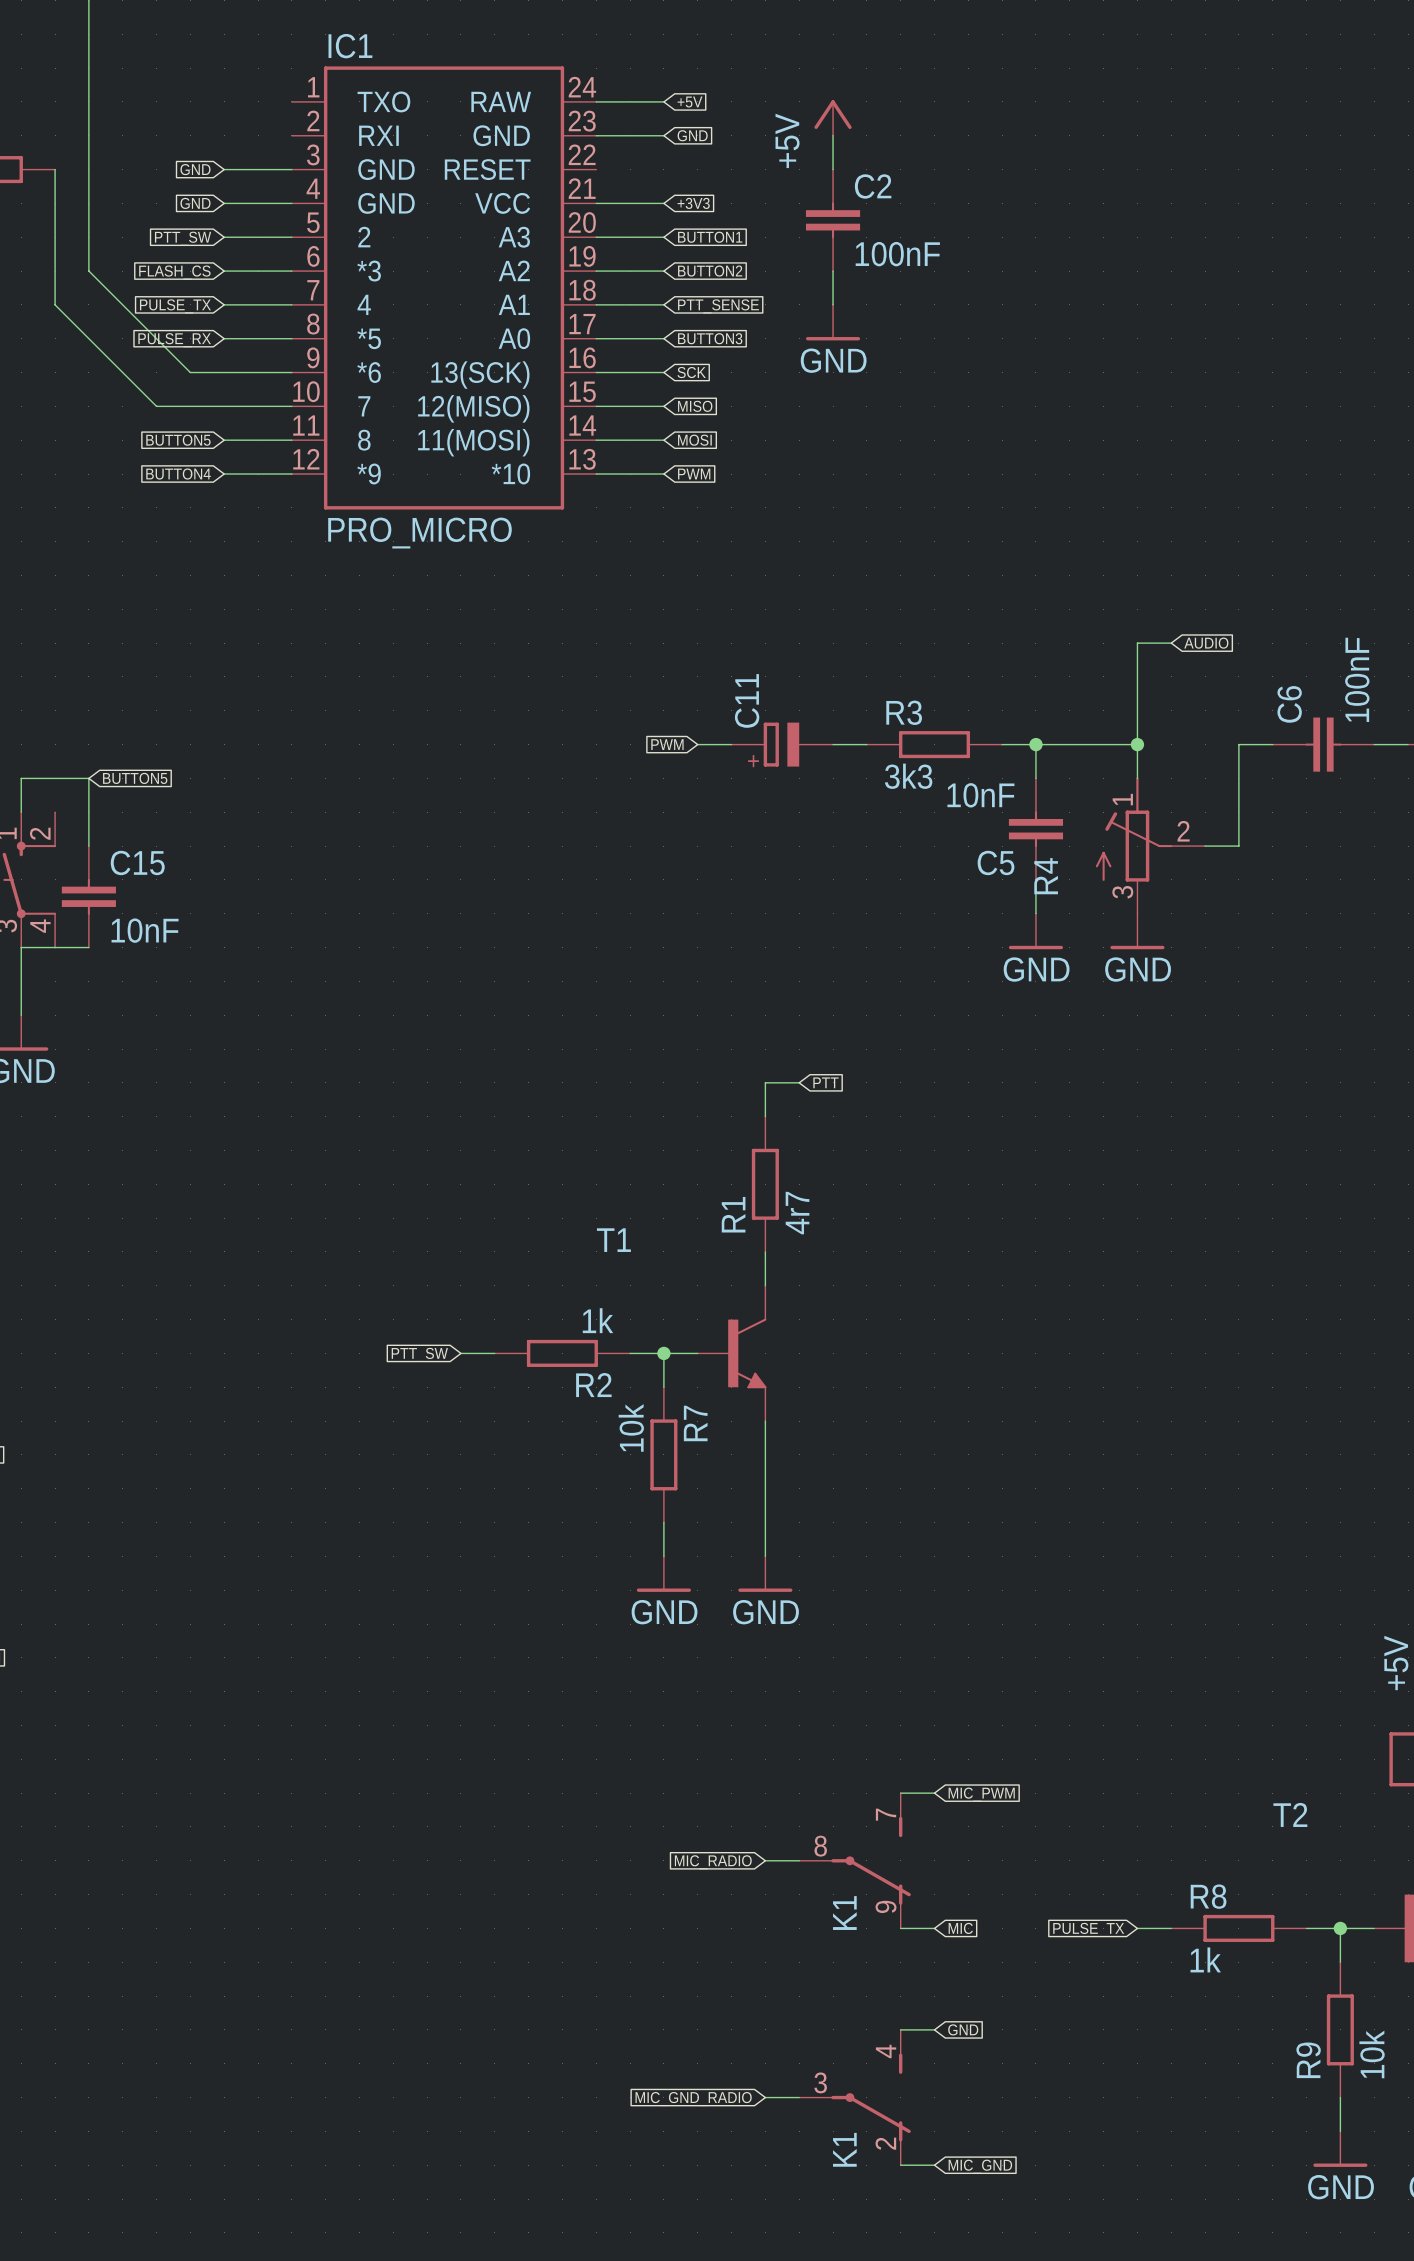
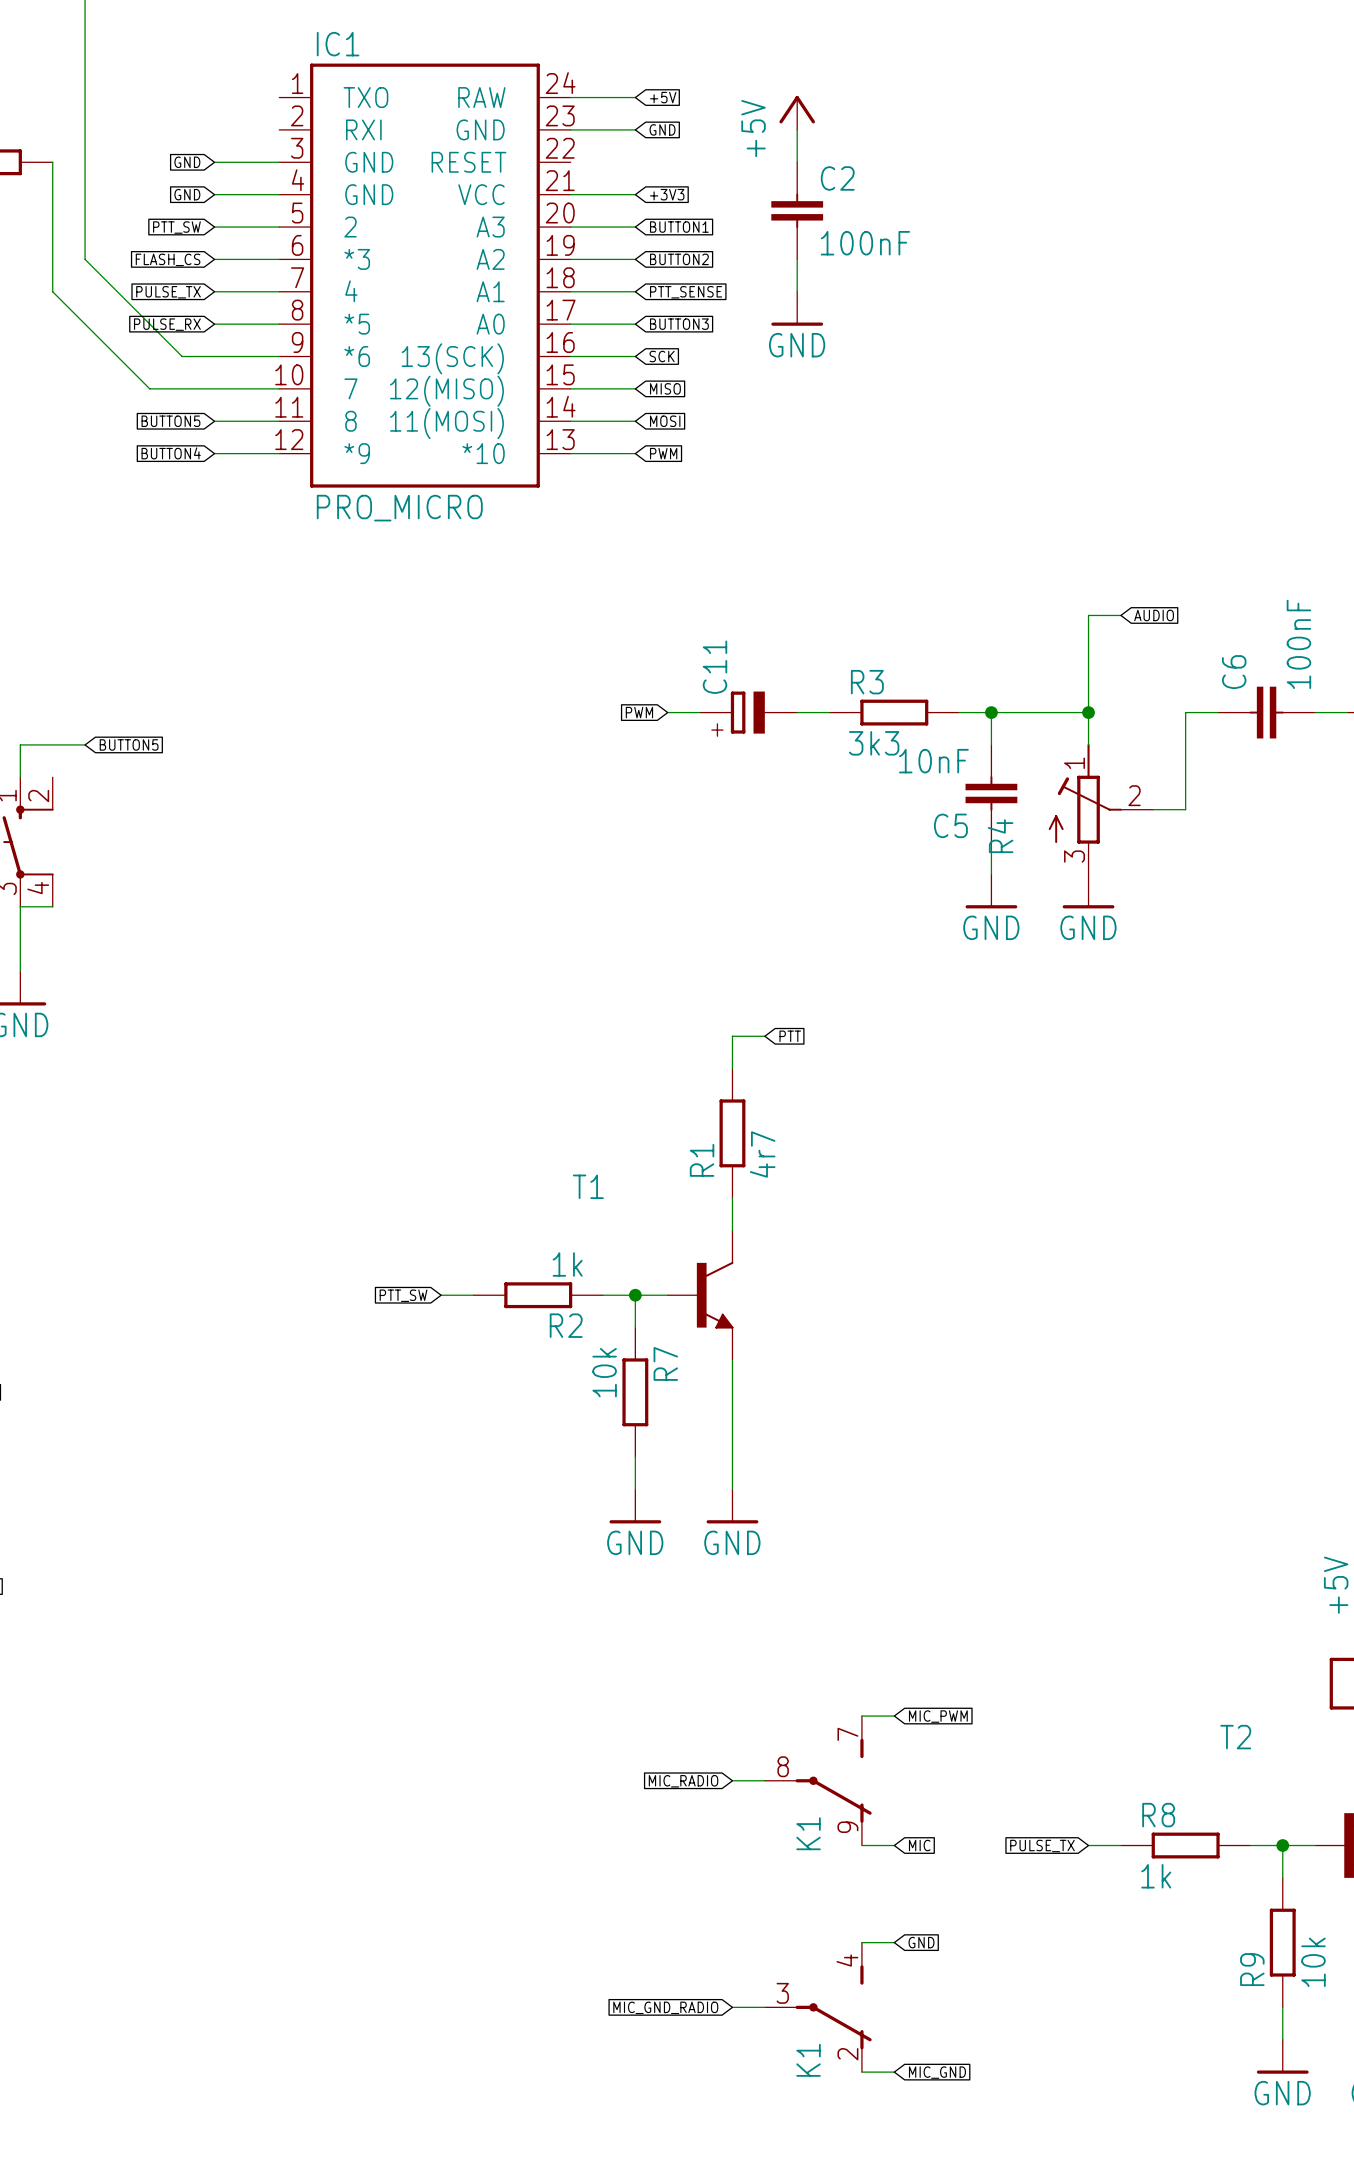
wire: (88, 778) (88, 846) -> none
C15: 10nF (88, 896) -> none
wire: (55, 947) (88, 947) -> none

